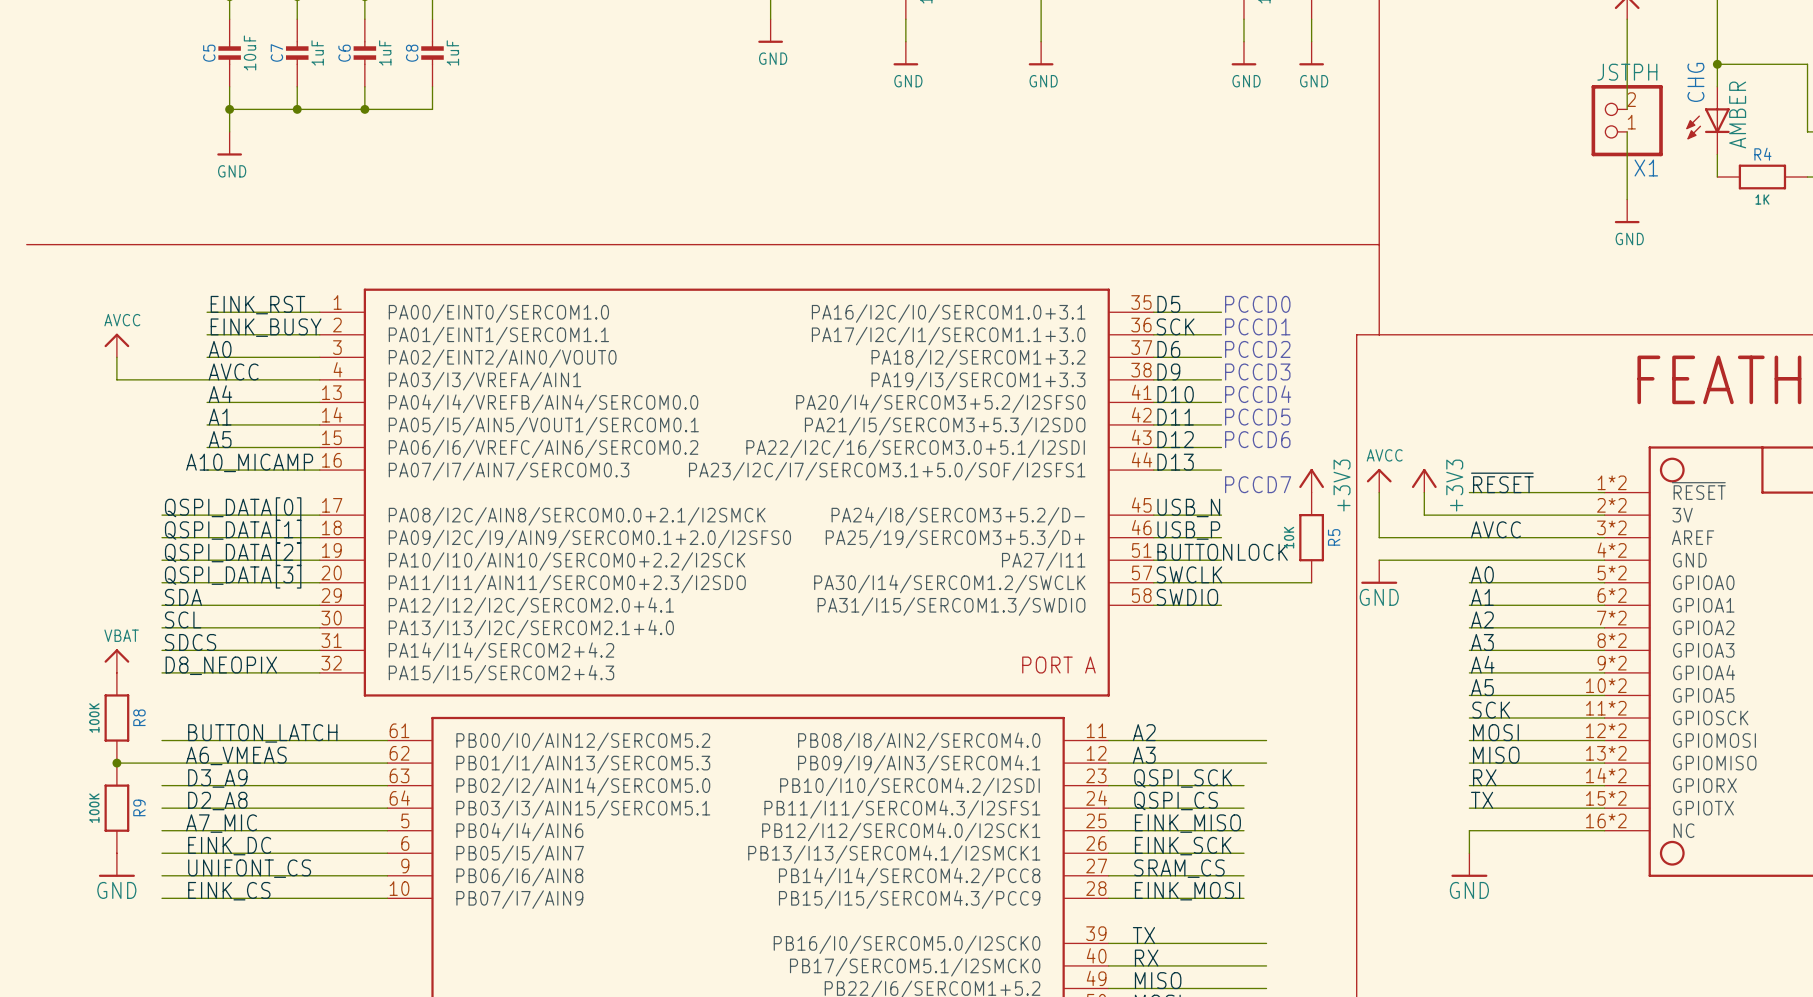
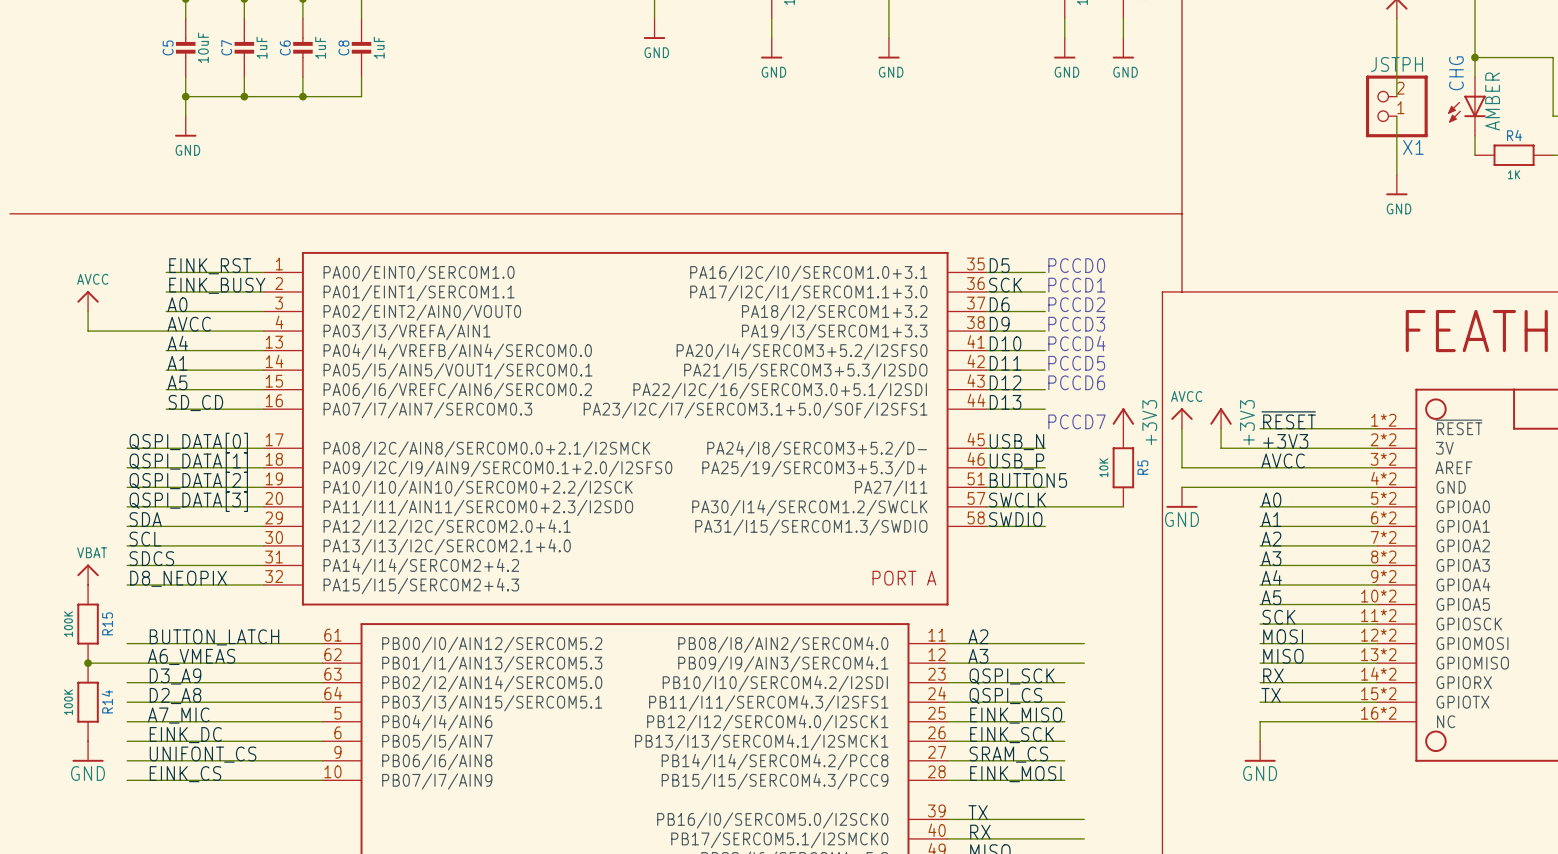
label: none -> SD_CD (195, 403)
label: A10_MICAMP (249, 462) -> none
label: none -> +3V3 (1285, 441)
label: BUTTONLOCK (1222, 552) -> BUTTON5 (1028, 480)
R8 name: R8 (139, 717) -> R15 (107, 623)
R9 name: R9 (139, 807) -> R14 (107, 701)

